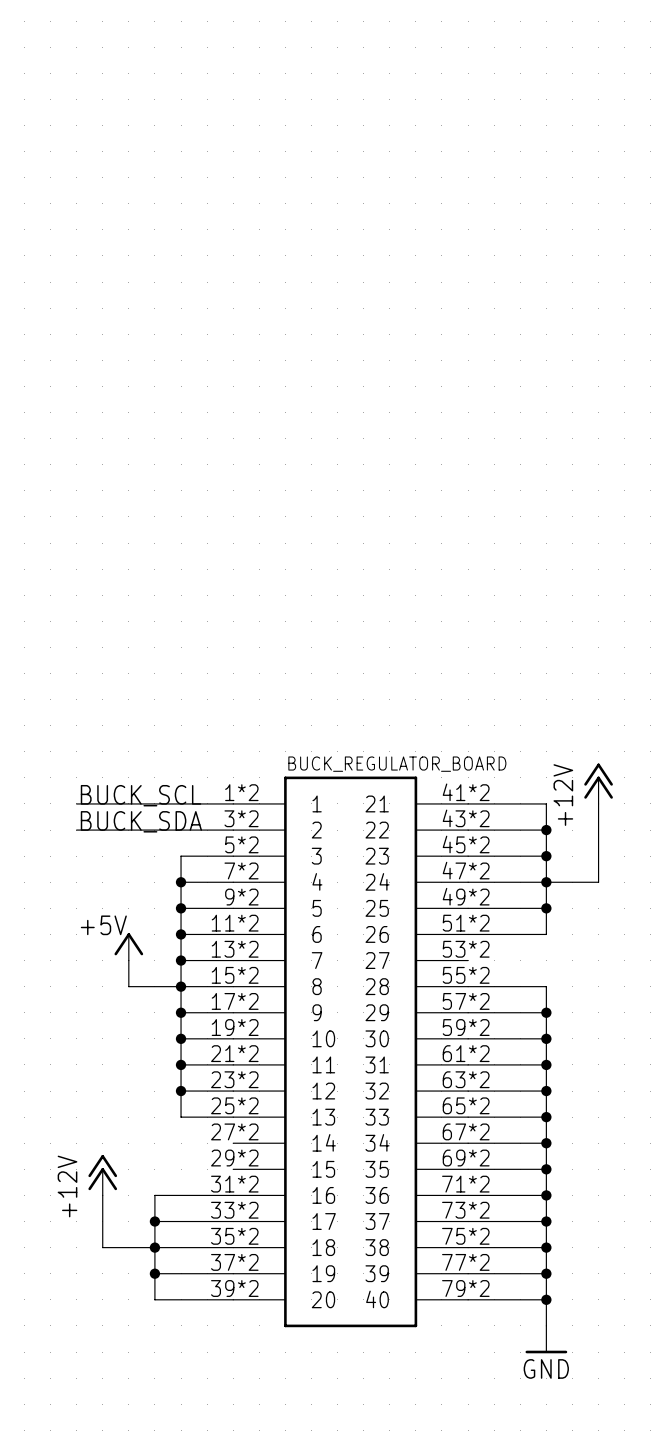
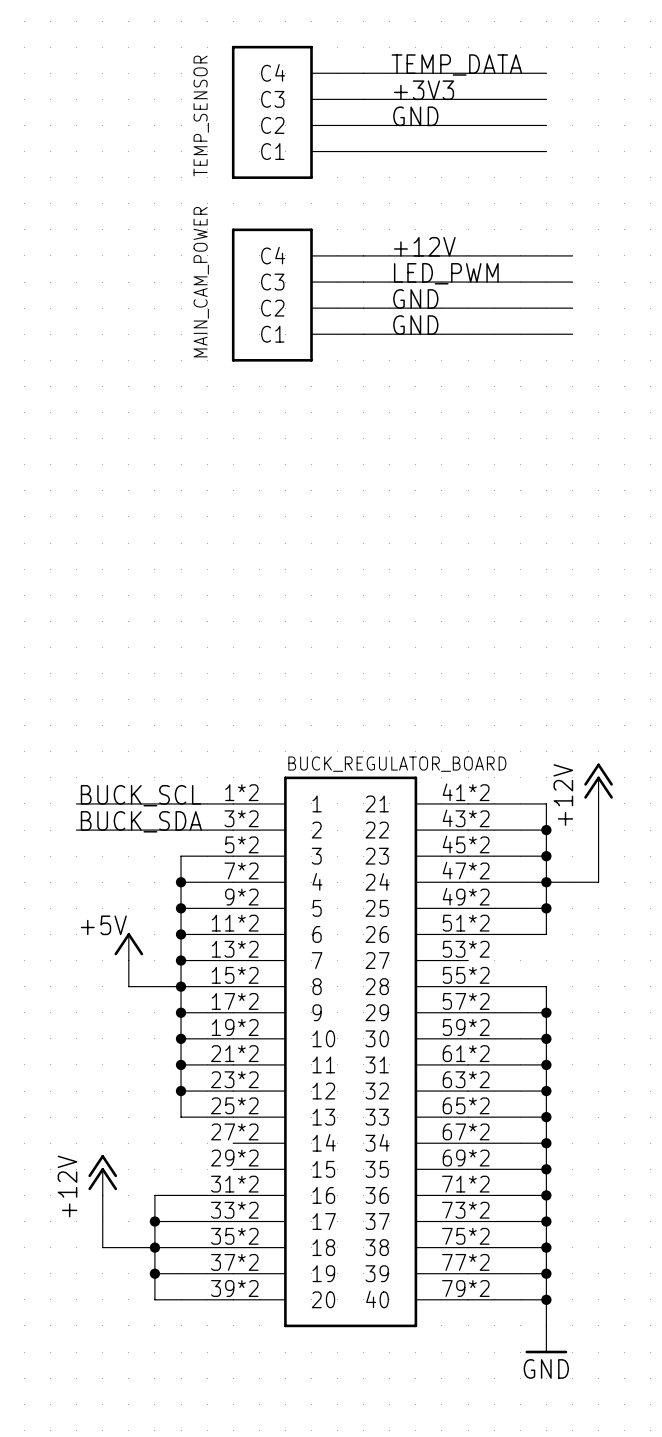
label: none -> TEMP_DATA (456, 65)
wire: none -> (363, 73) (546, 73)
label: none -> +3V3 (424, 90)
wire: none -> (363, 99) (546, 99)
TEMP_SENSOR: none -> (297, 112)
label: none -> GND (415, 116)
wire: none -> (363, 125) (546, 125)
wire: none -> (363, 151) (546, 151)
label: none -> +12V (424, 246)
wire: none -> (363, 255) (572, 255)
label: none -> LED_PWM (446, 273)
wire: none -> (363, 282) (572, 282)
MAIN_CAM_POWER: none -> (297, 295)
label: none -> GND (415, 299)
wire: none -> (363, 308) (572, 308)
label: none -> GND (415, 325)
wire: none -> (363, 334) (572, 334)

